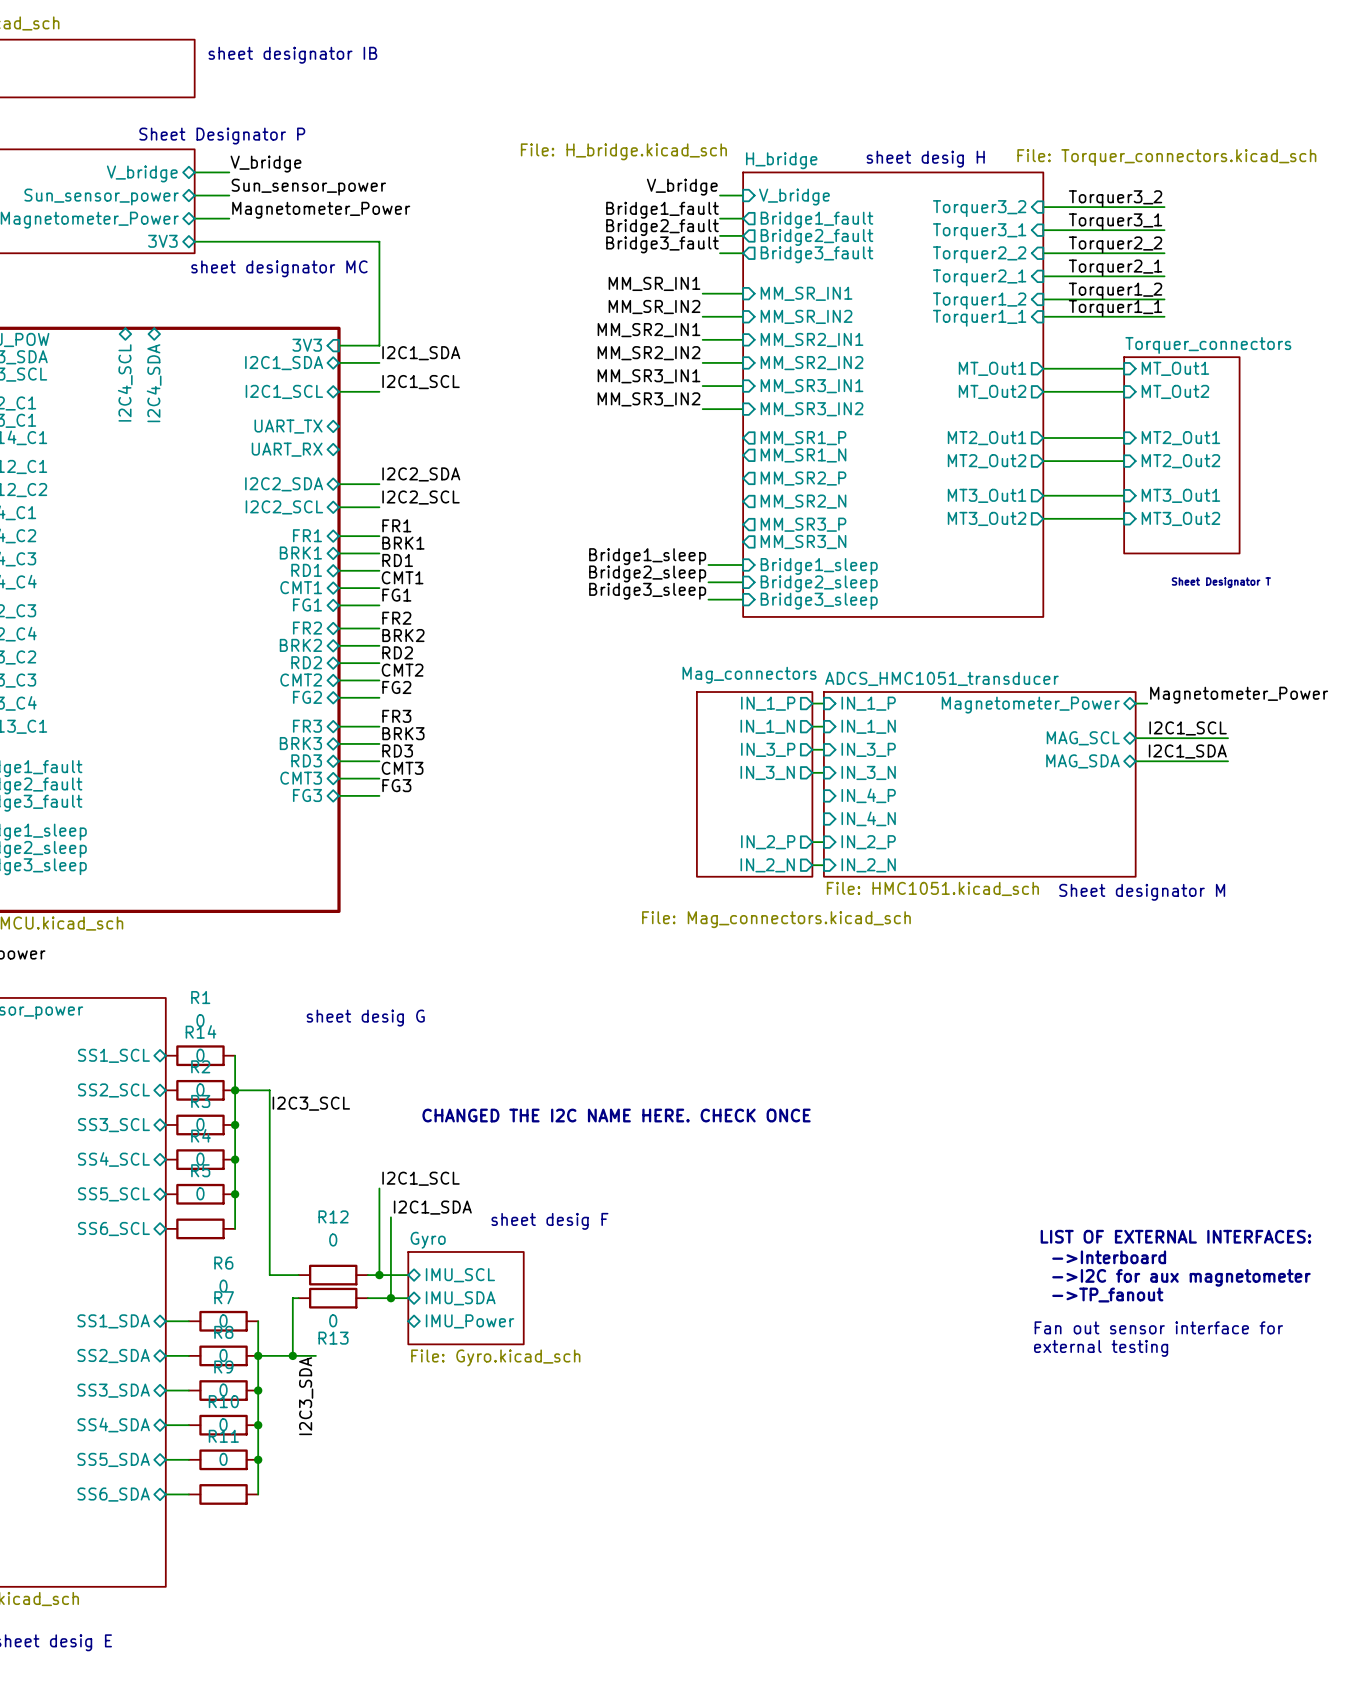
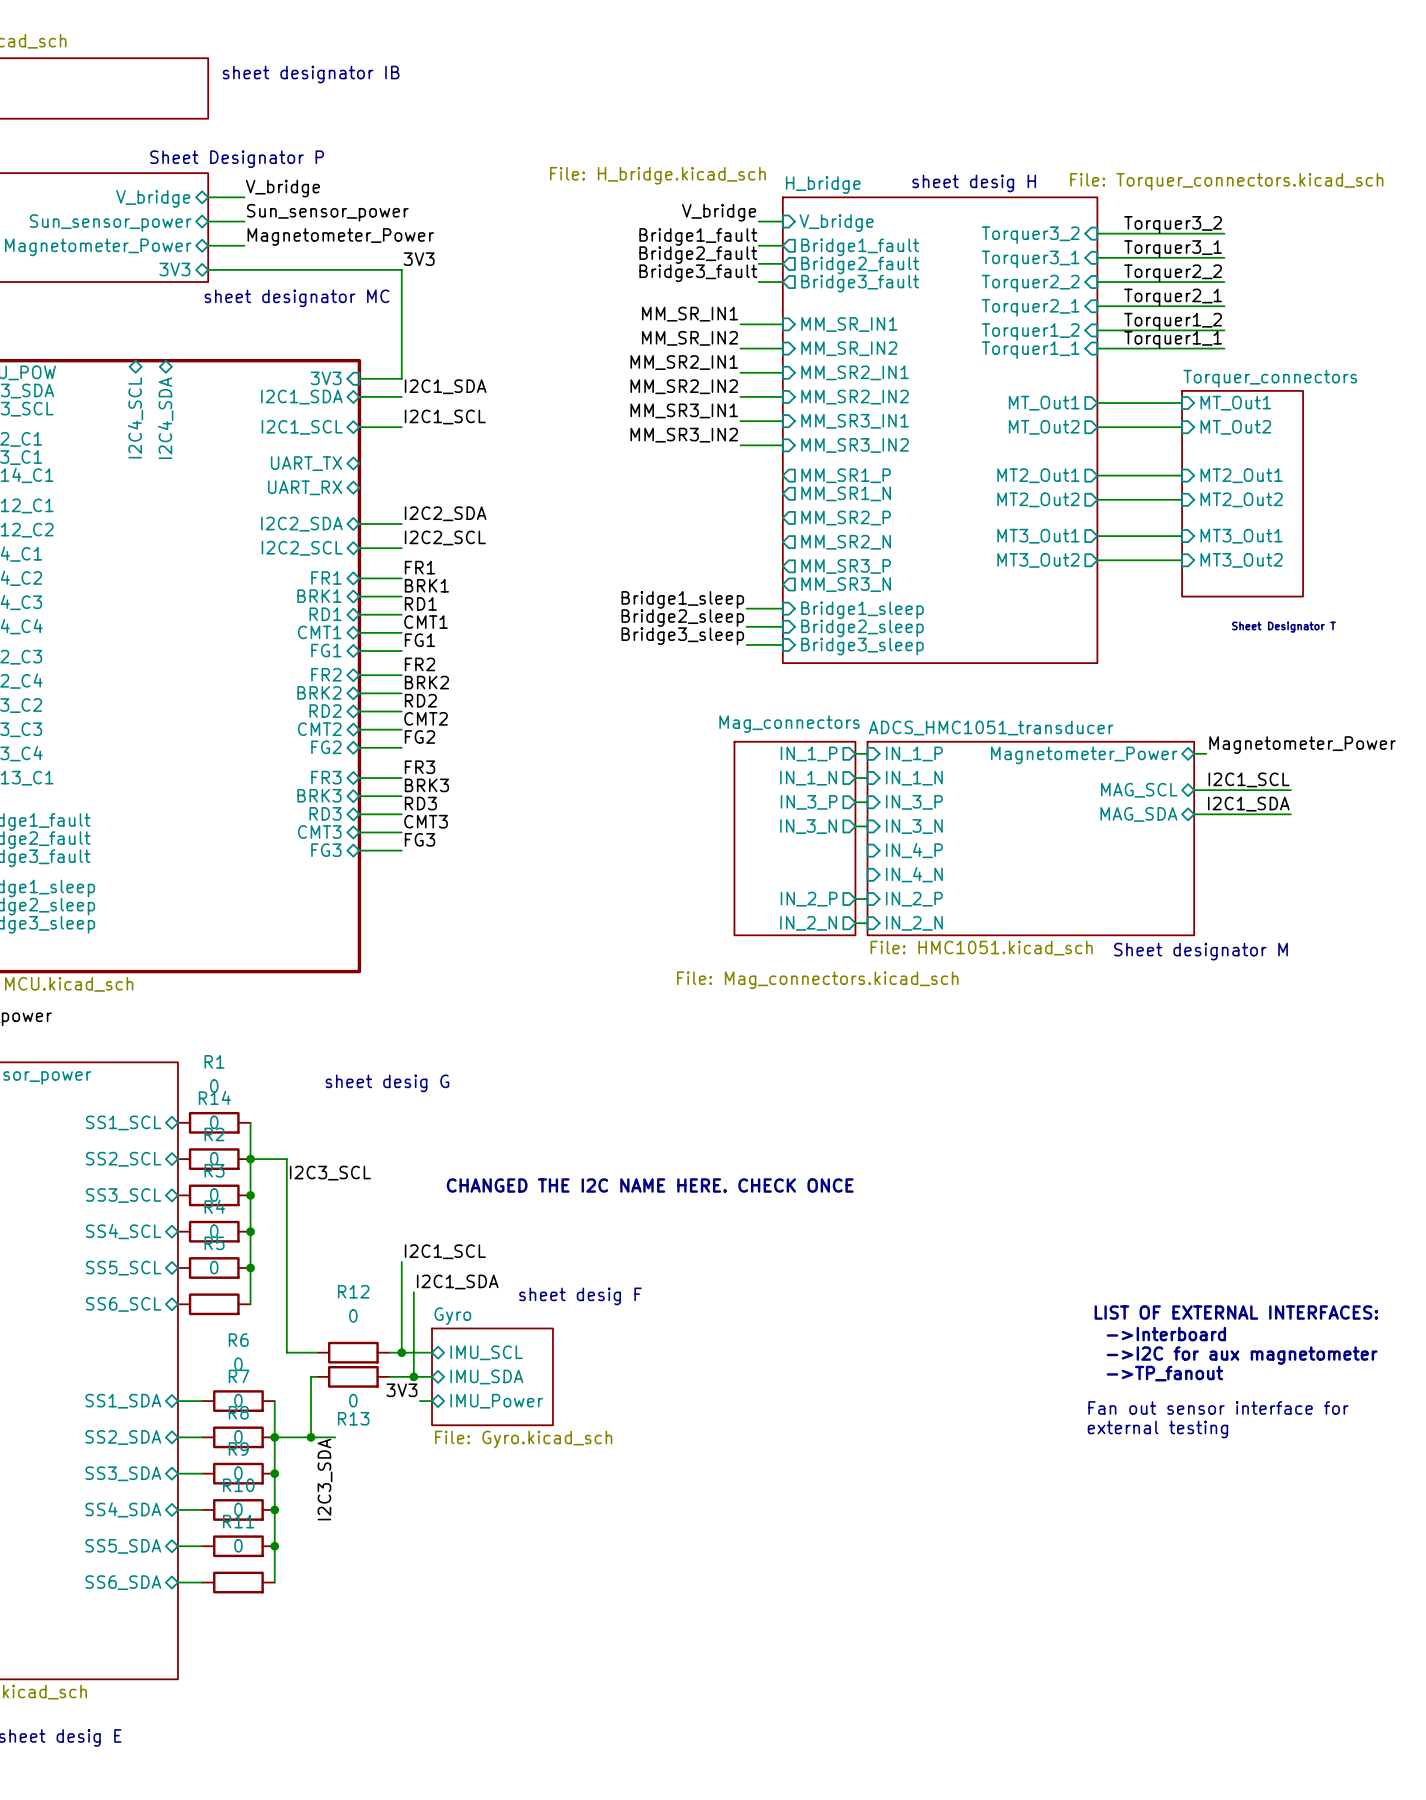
label: none -> 3V3 (419, 259)
label: none -> 3V3 (401, 1390)
wire: none -> (419, 1401) (432, 1401)

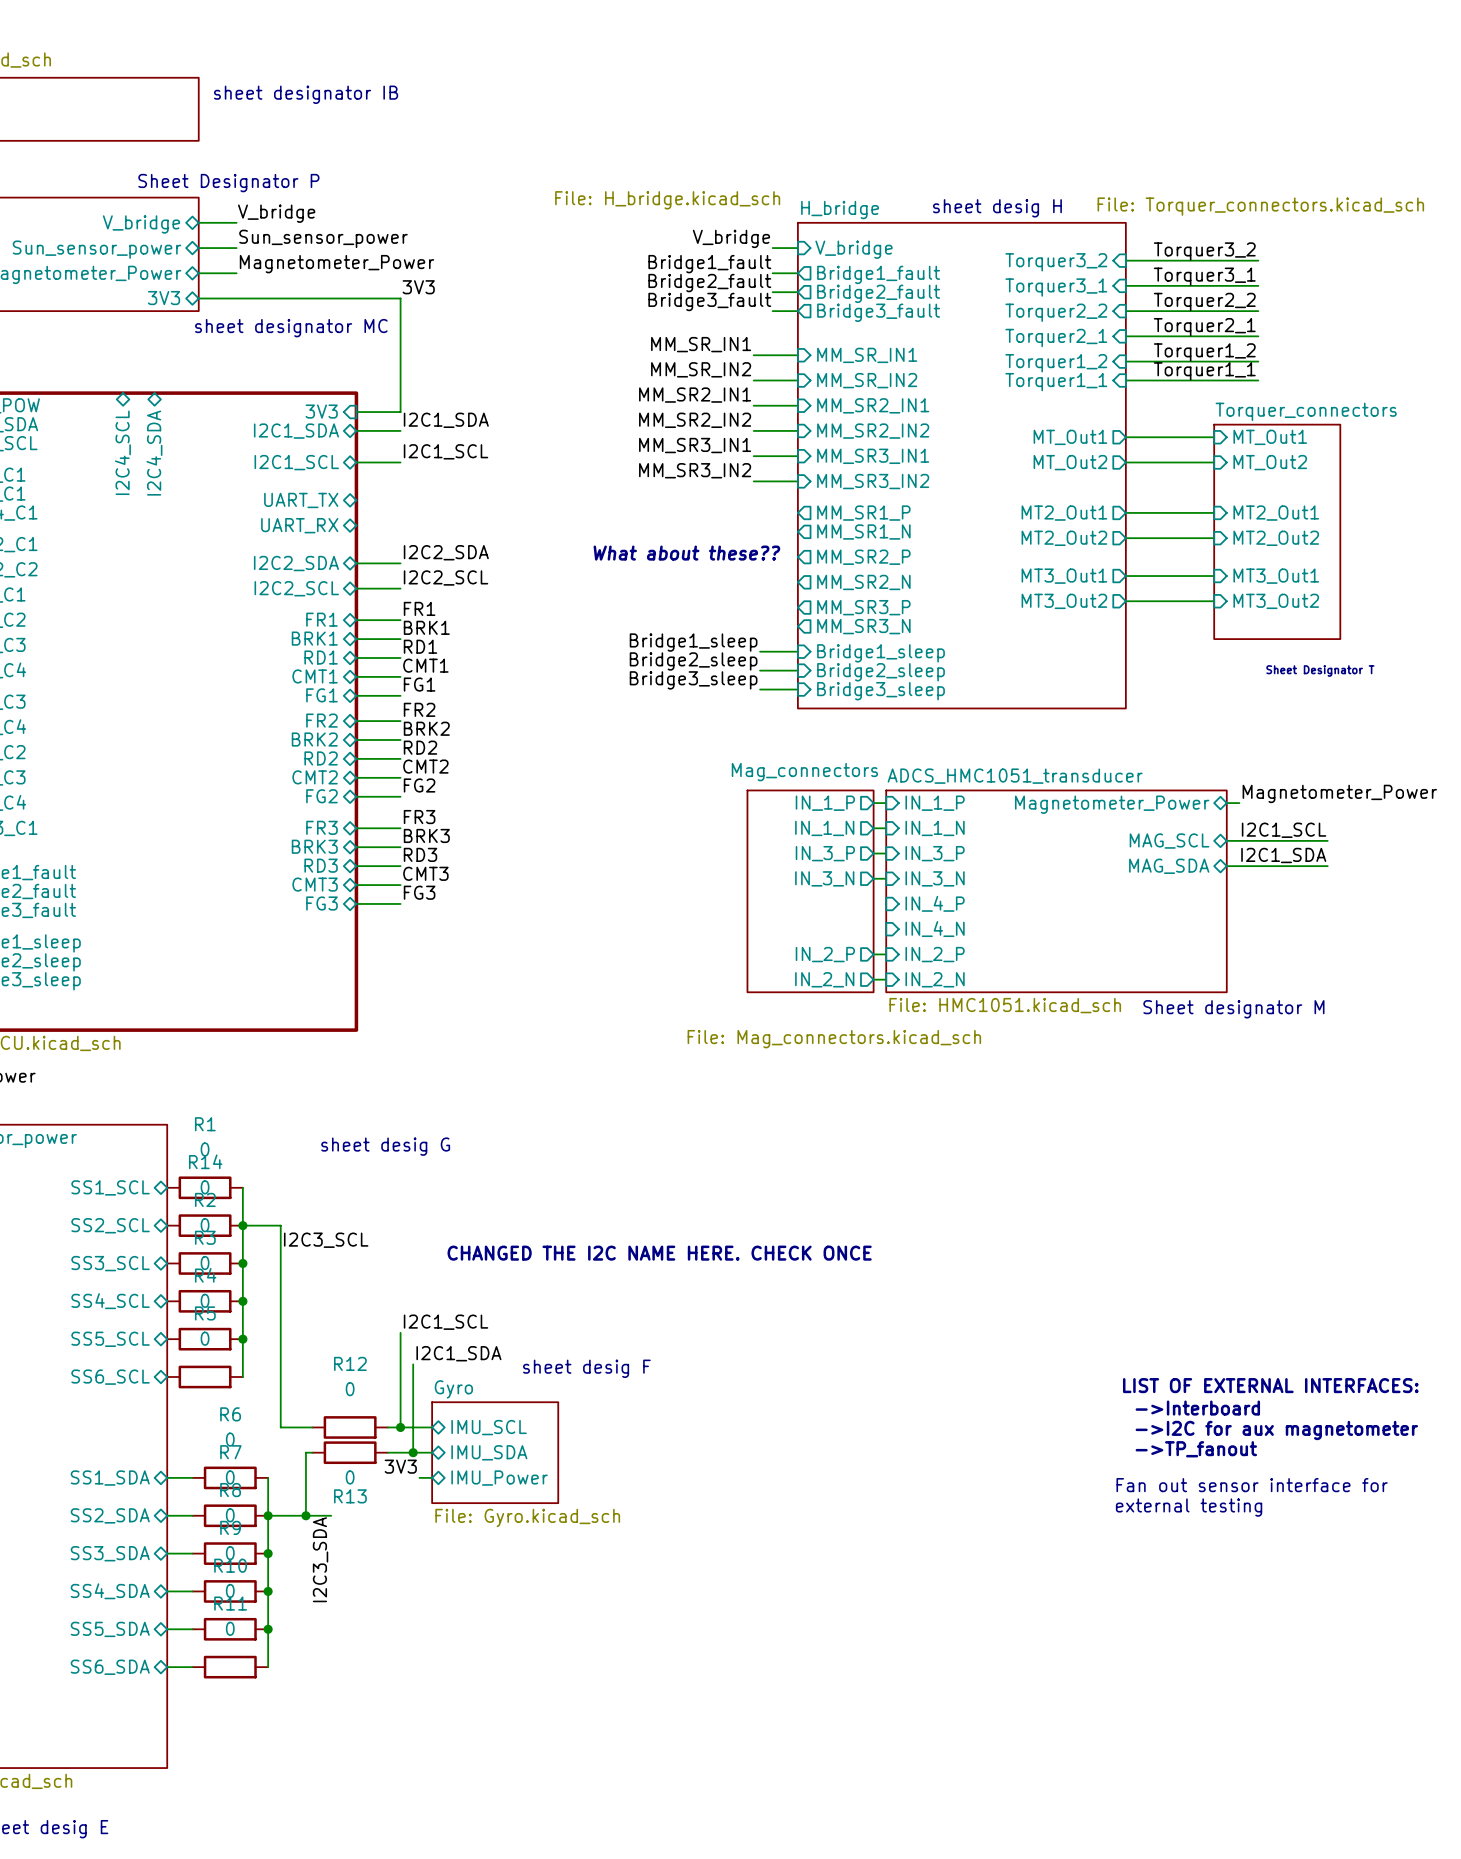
text: none -> What about these?? (686, 553)

